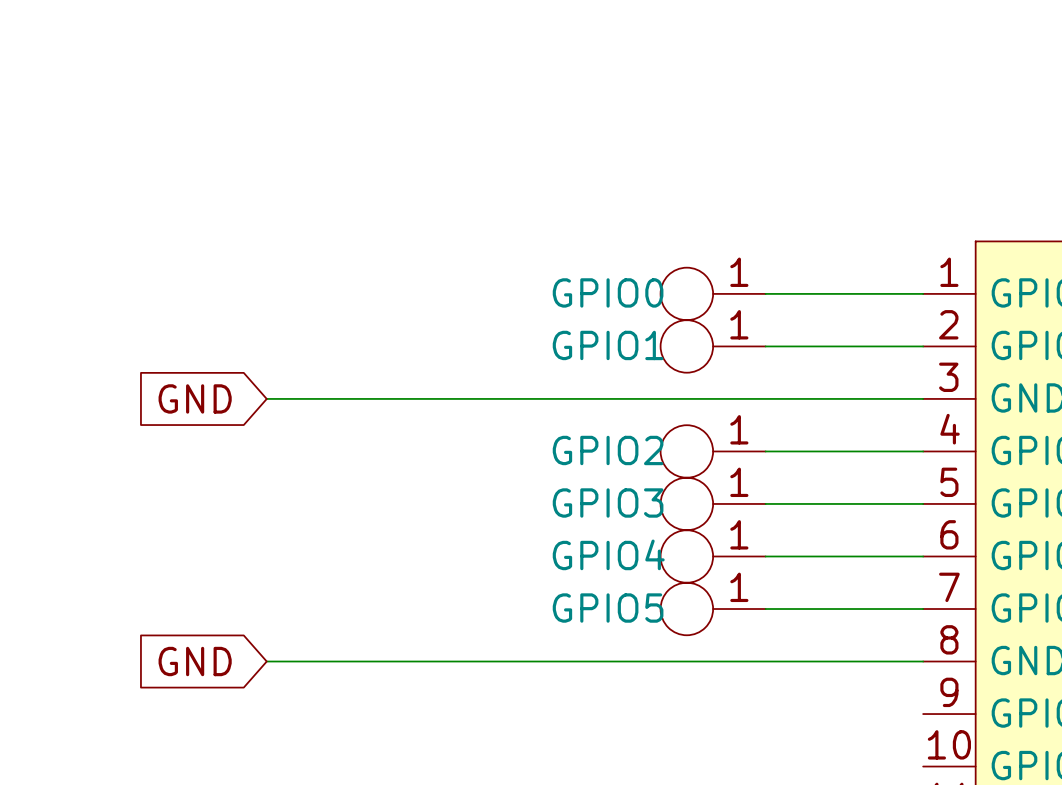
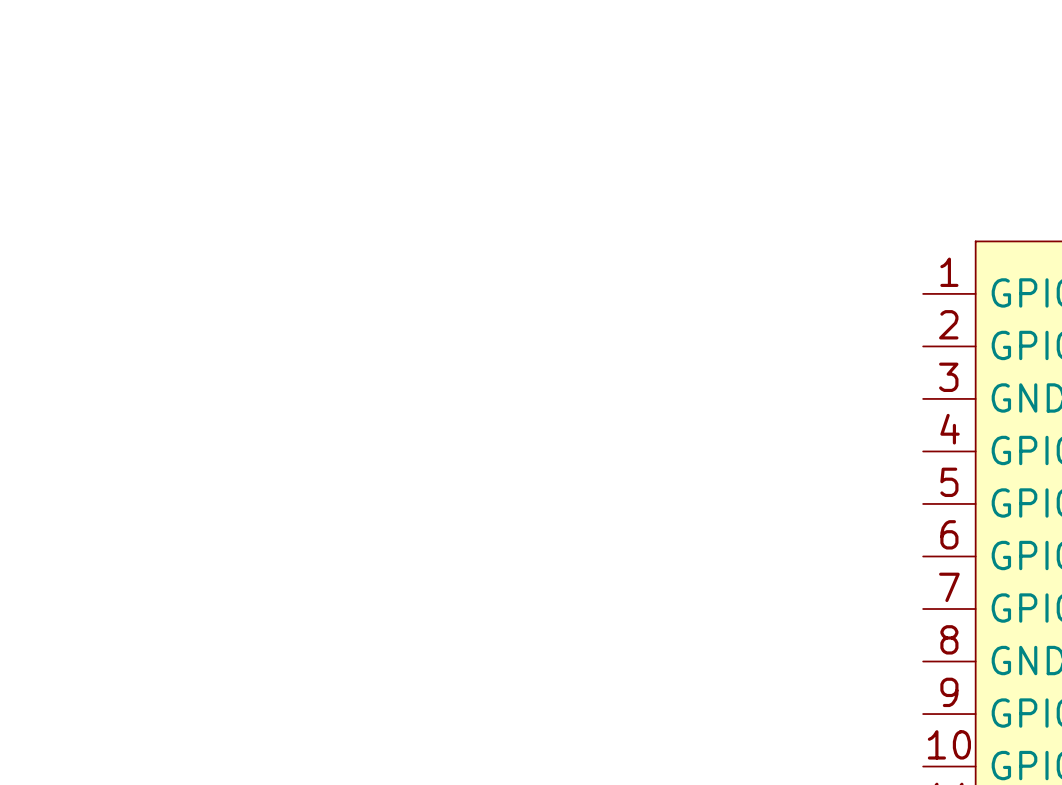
GPIO0: (726, 293) -> none
wire: (765, 293) (923, 293) -> none
GPIO1: (726, 346) -> none
wire: (765, 346) (923, 346) -> none
global label: GND (195, 398) -> none
wire: (266, 398) (923, 398) -> none
GPIO2: (726, 451) -> none
wire: (765, 451) (923, 451) -> none
GPIO3: (726, 503) -> none
wire: (765, 503) (923, 503) -> none
GPIO4: (726, 556) -> none
wire: (765, 556) (923, 556) -> none
GPIO5: (726, 609) -> none
wire: (765, 609) (923, 609) -> none
global label: GND (195, 661) -> none
wire: (266, 661) (923, 661) -> none

